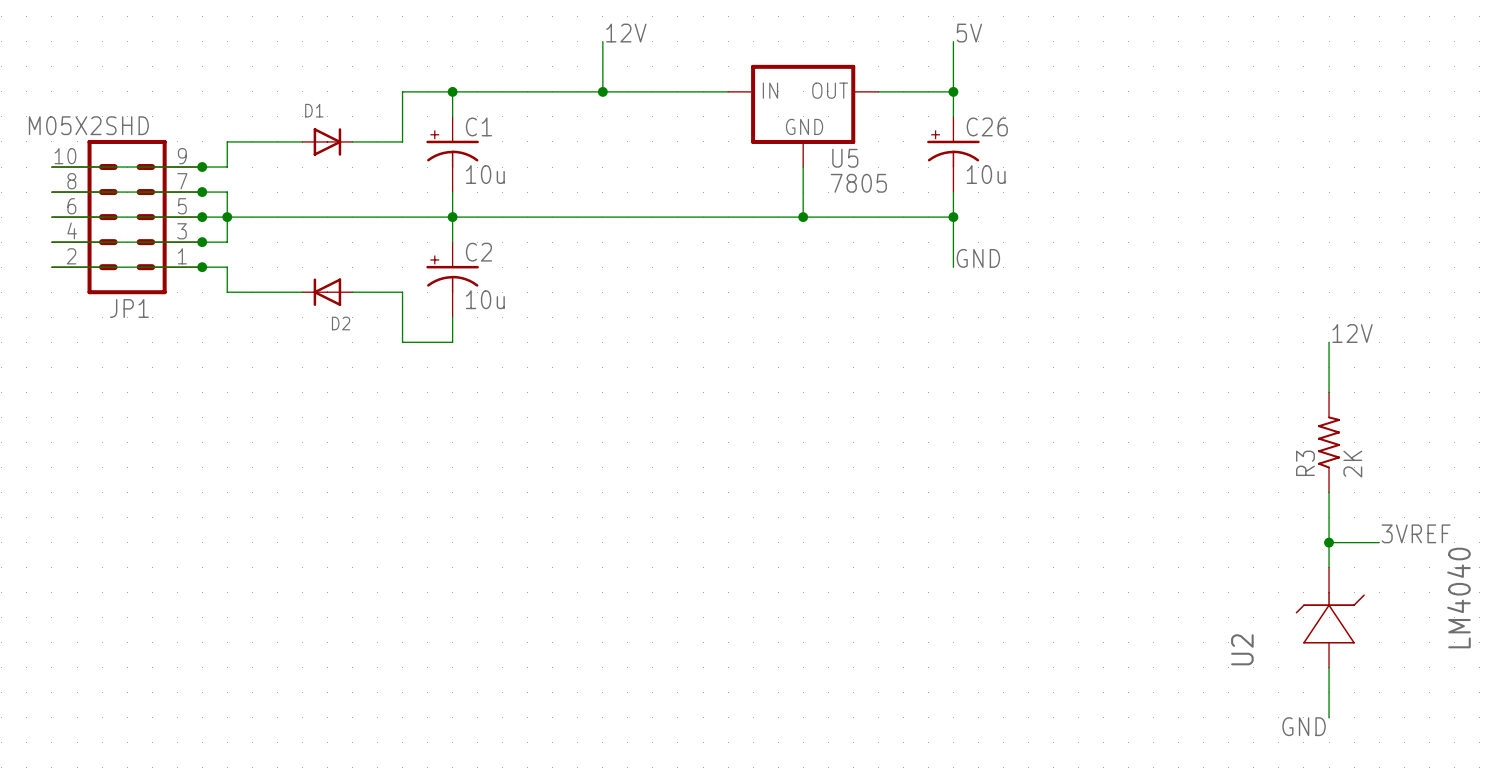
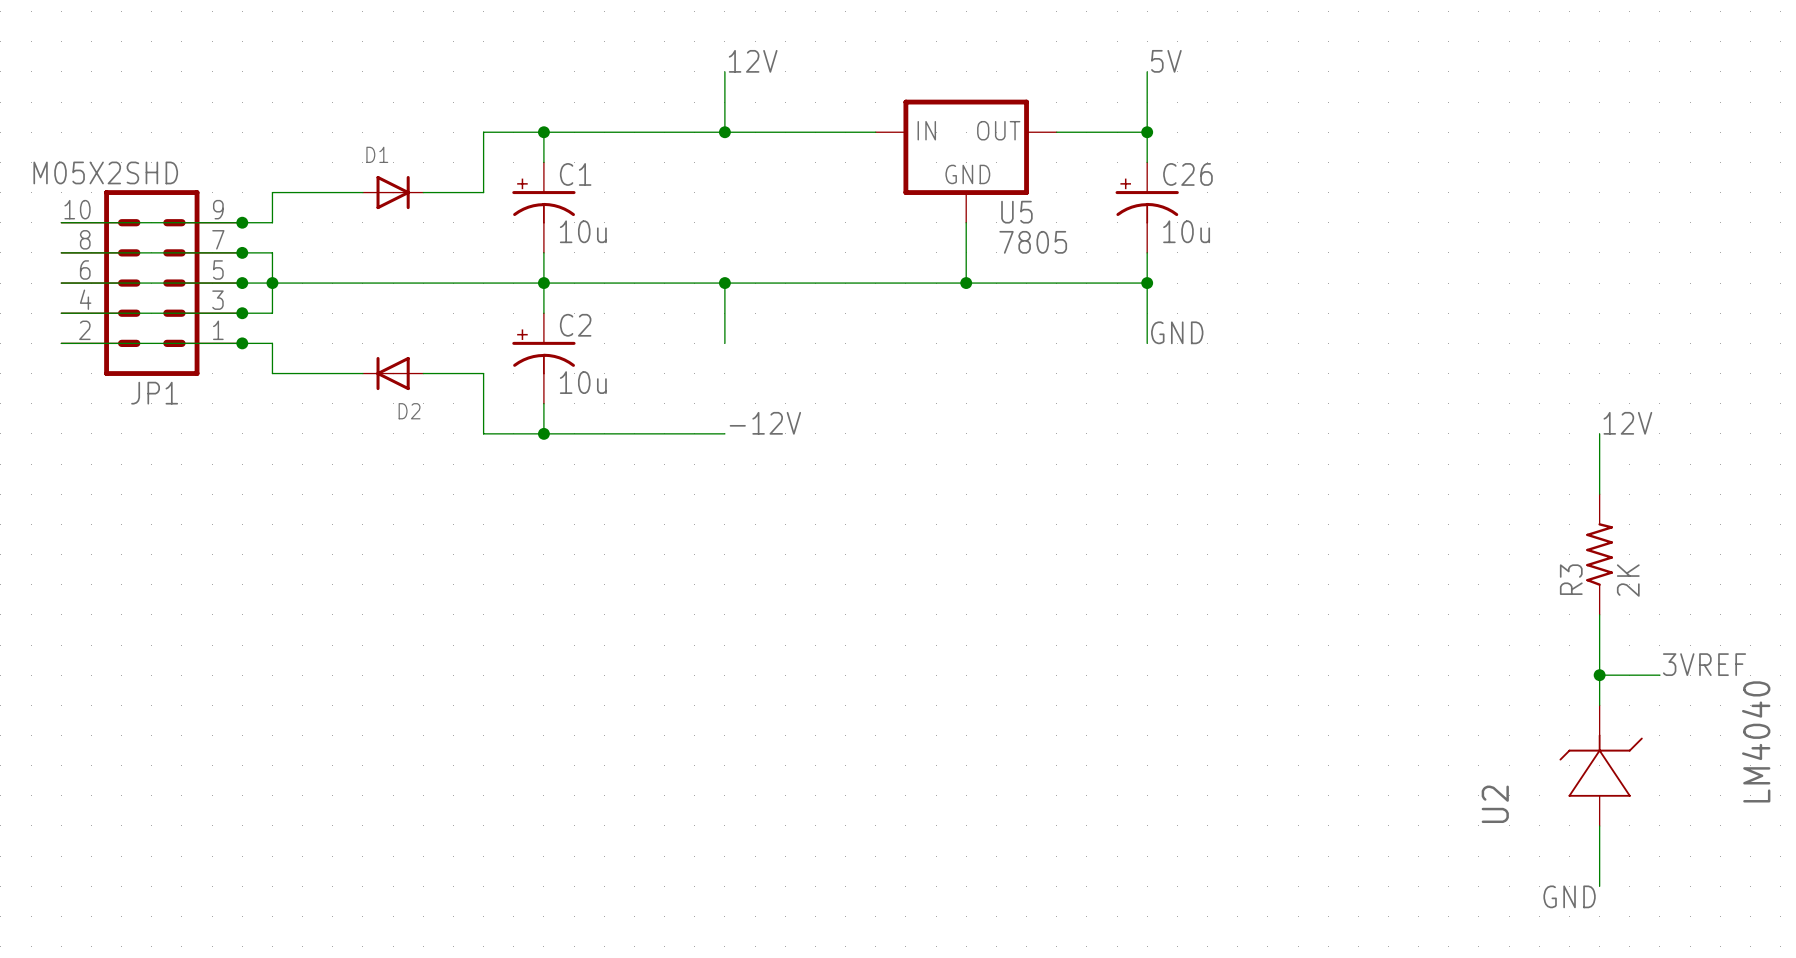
wire: none -> (724, 283) (724, 343)
junction: none -> (724, 283)
label: none -> -12V (765, 423)
wire: none -> (543, 433) (724, 433)
junction: none -> (543, 433)

